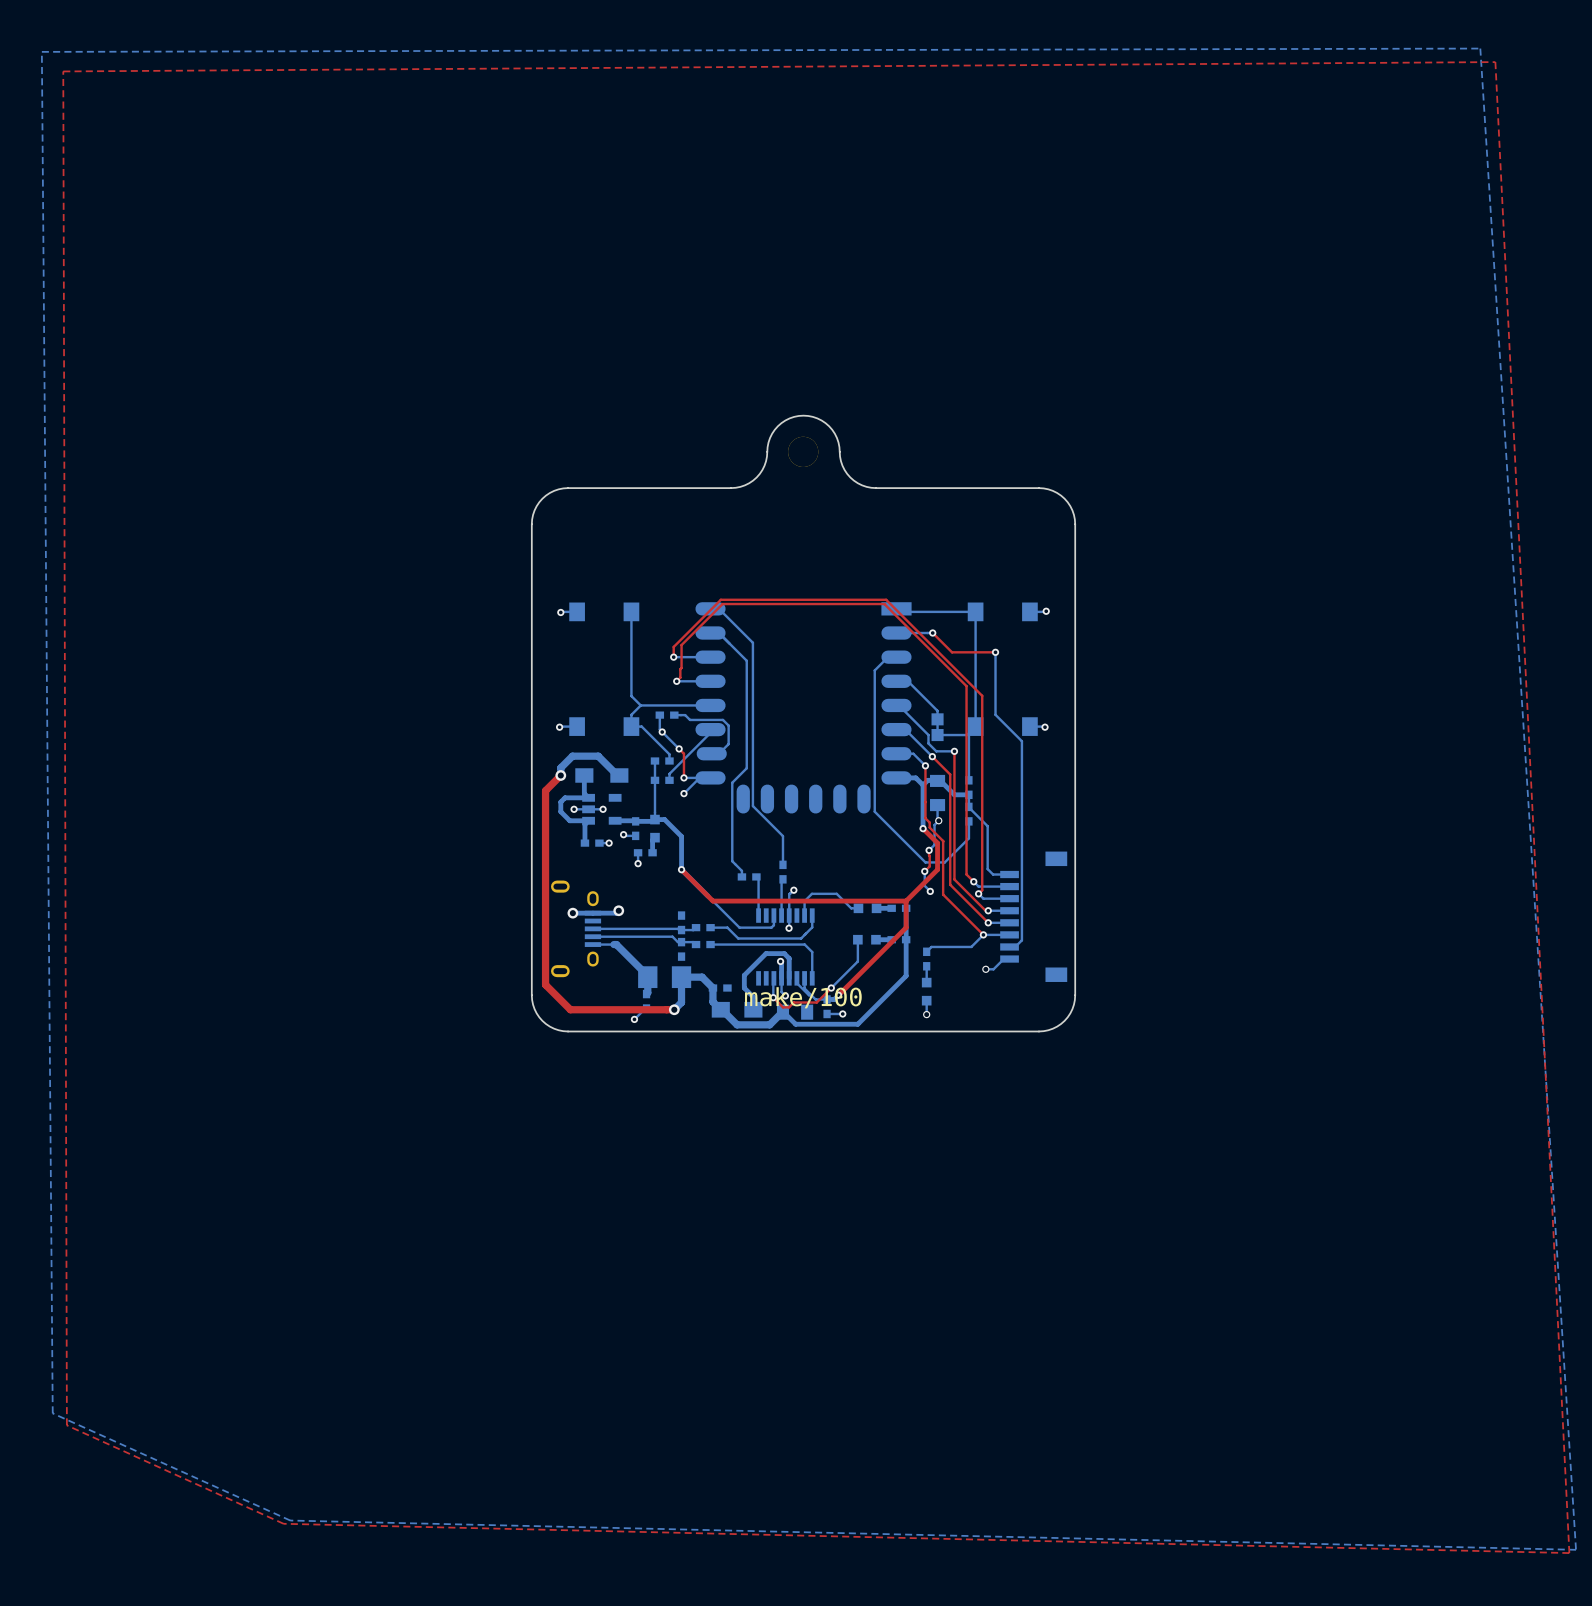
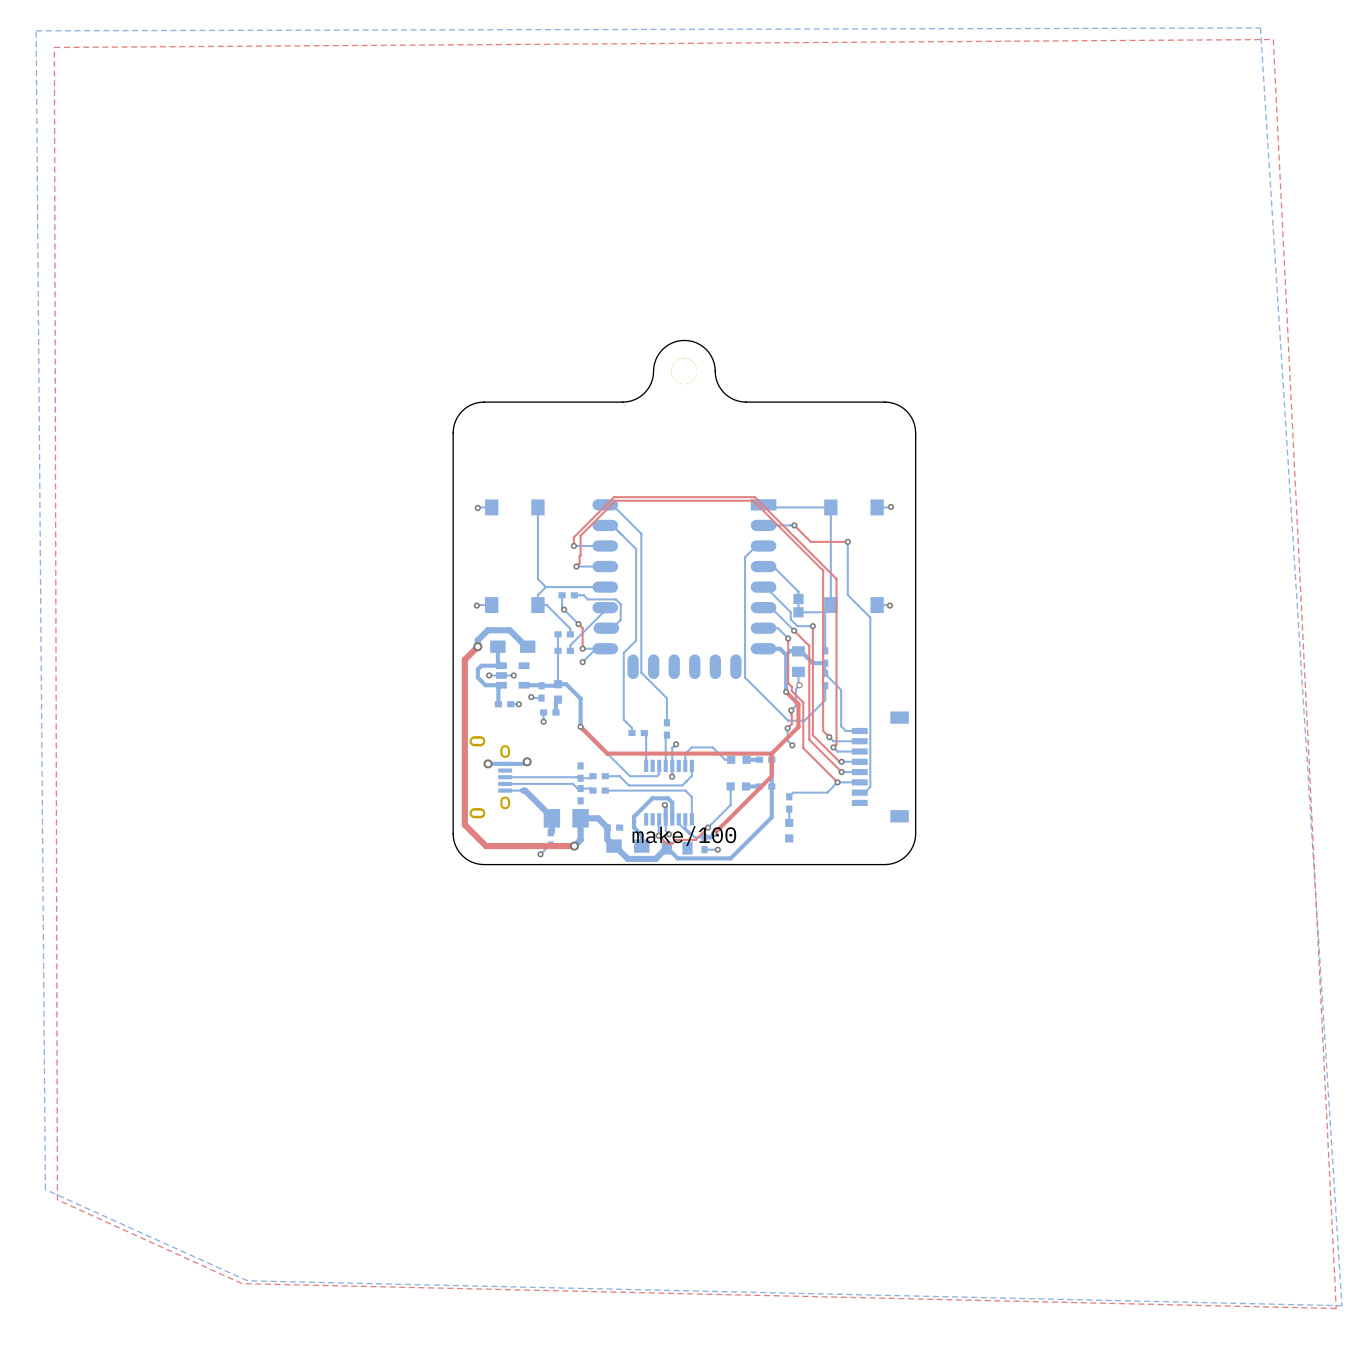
bottom track: (1009, 959) (1003, 959) (993, 969) (985, 969) -> none
via: (985, 969) -> none
bottom track: (926, 1000) (926, 1014) -> none
via: (926, 1014) -> none

